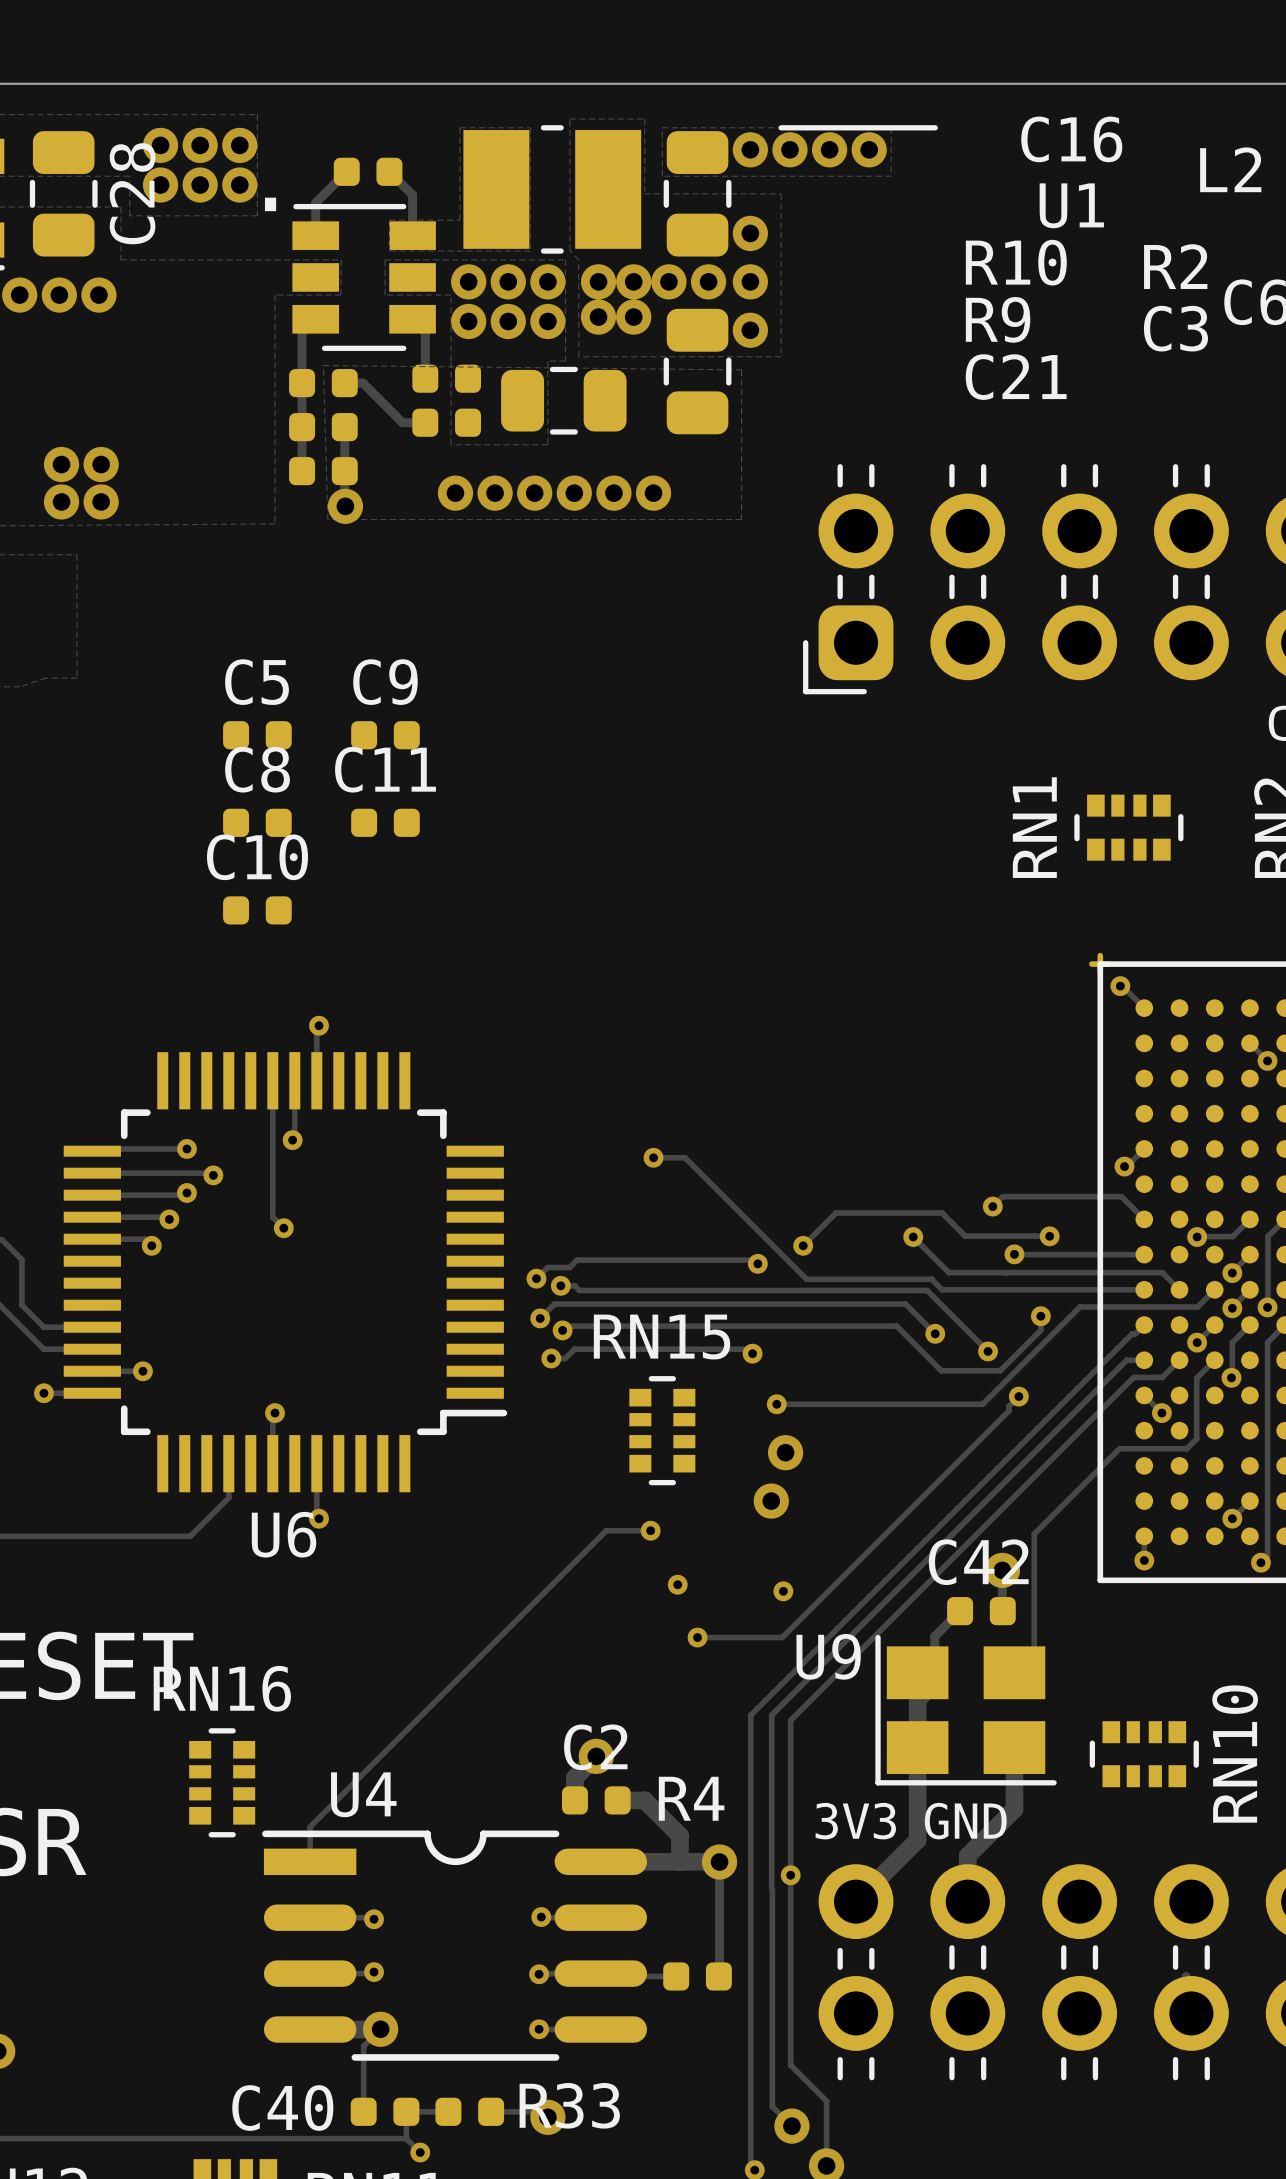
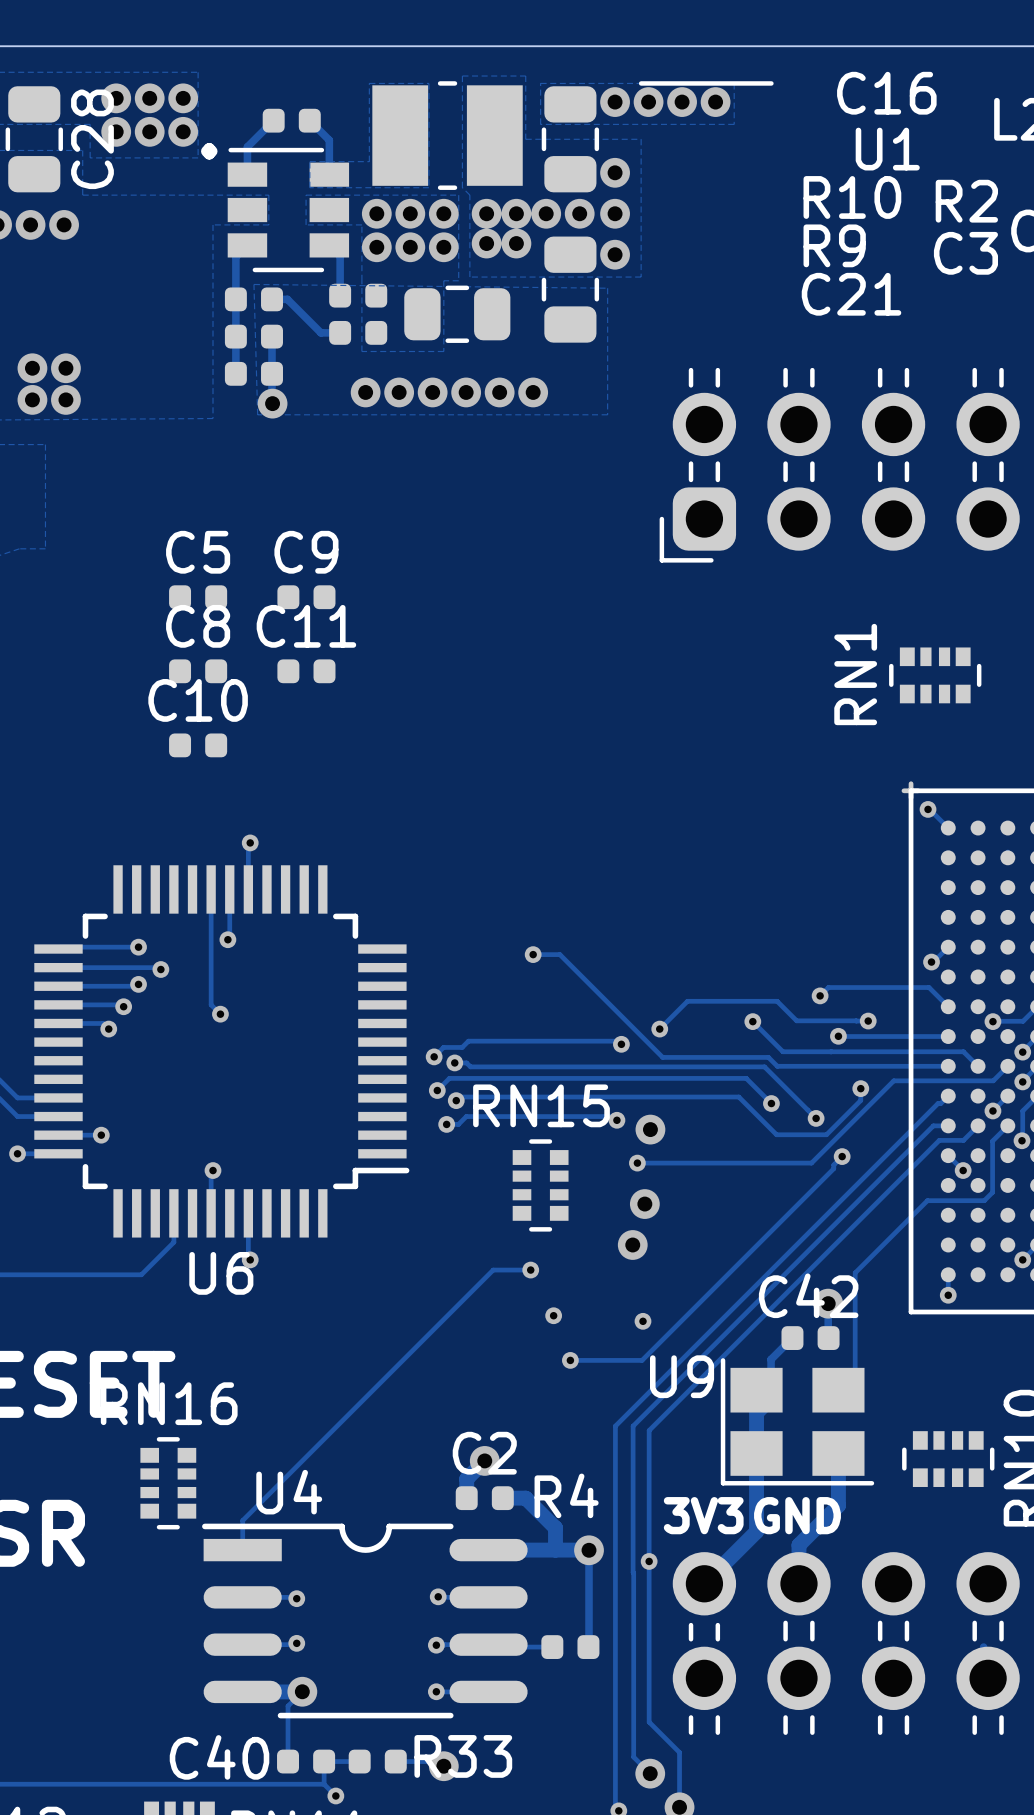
via: none -> (650, 1129)

